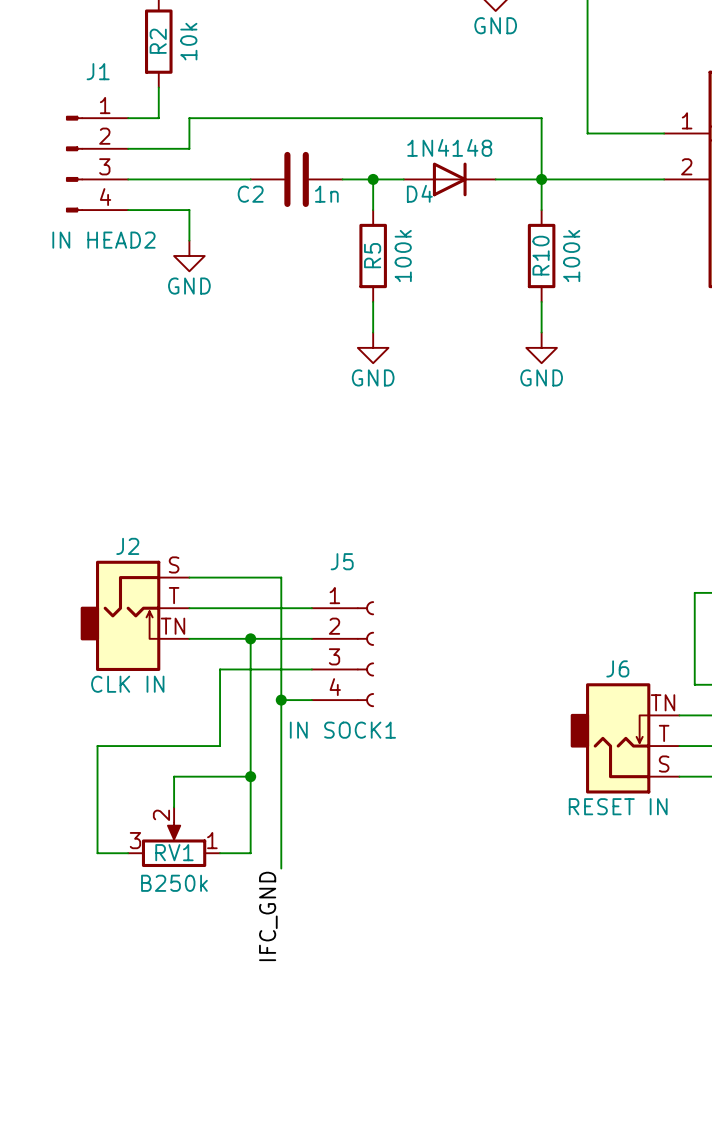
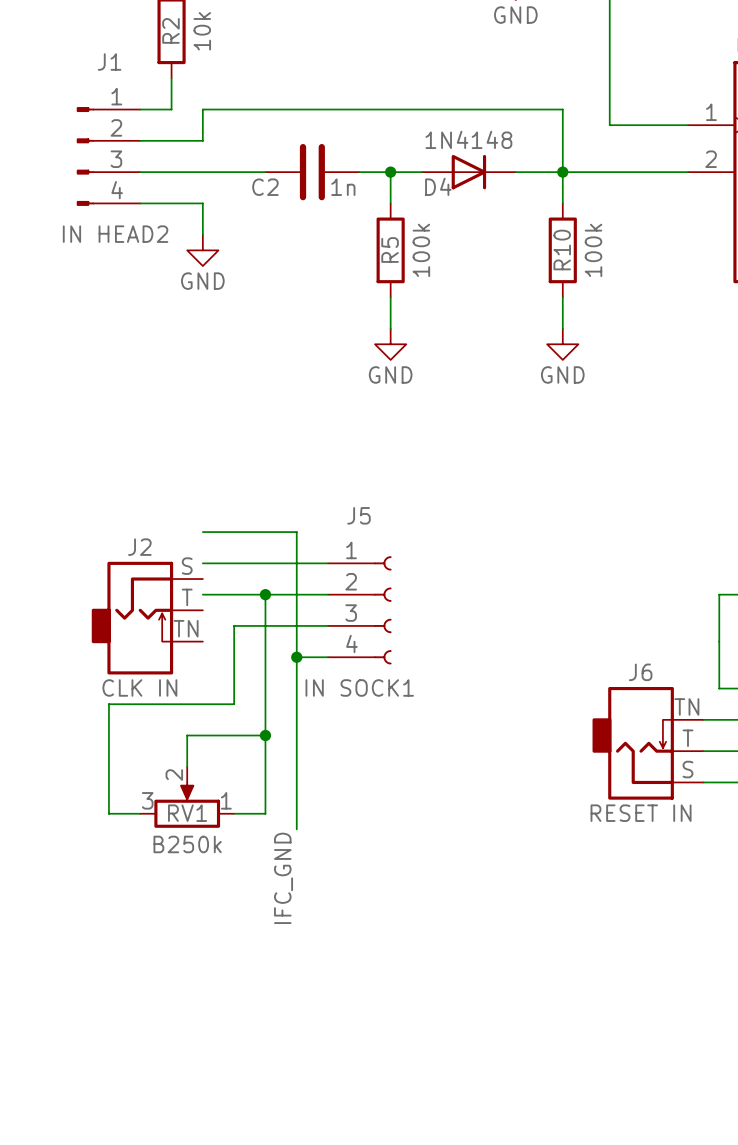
wire: (189, 577) (281, 577) -> (202, 532) (296, 532) (296, 579)
junction: none -> (265, 594)
wire: (189, 608) (311, 608) -> (202, 563) (328, 563)
wire: (189, 638) (311, 638) -> (202, 594) (328, 594)
junction: (250, 638) -> none
junction: none -> (296, 657)
J5 position: (343, 654) -> (359, 610)
wire: (220, 669) (311, 669) -> (234, 672) (234, 625) (328, 625)
wire: (220, 700) (220, 746) (97, 746) -> (234, 704) (108, 704) (108, 751)
wire: (281, 700) (311, 700) -> (296, 657) (328, 657)
junction: (281, 700) -> none
junction: none -> (265, 735)
wire: (250, 776) (174, 776) (174, 807) -> (265, 735) (187, 735) (187, 766)
junction: (250, 776) -> none
wire: (97, 807) (97, 853) (128, 853) -> (108, 813) (140, 813)
wire: (250, 807) (250, 853) (220, 853) -> (265, 813) (234, 813)
wire: (281, 822) (281, 868) -> (265, 594) (265, 641)
RV1 position: (174, 837) -> (187, 797)
label position: IFC_GND (268, 916) -> IFC_GND (283, 878)

